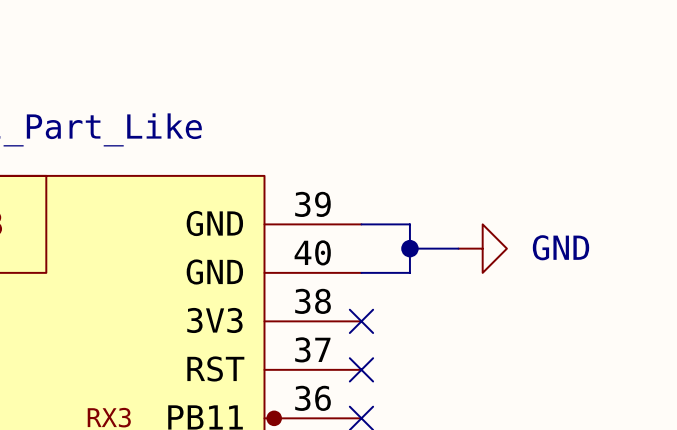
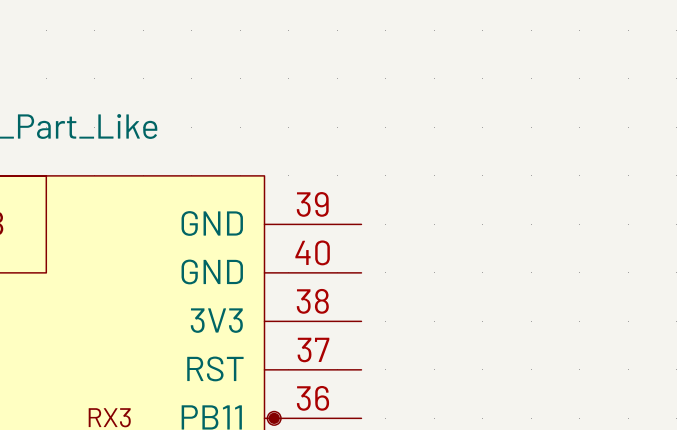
wire: (361, 224) (409, 224) (409, 272) (361, 272) -> none
wire: (409, 248) (458, 248) -> none
junction: (409, 248) -> none
power symbol: GND (482, 248) -> none
no-connect mark: (361, 321) -> none
no-connect mark: (361, 369) -> none
no-connect mark: (361, 418) -> none

